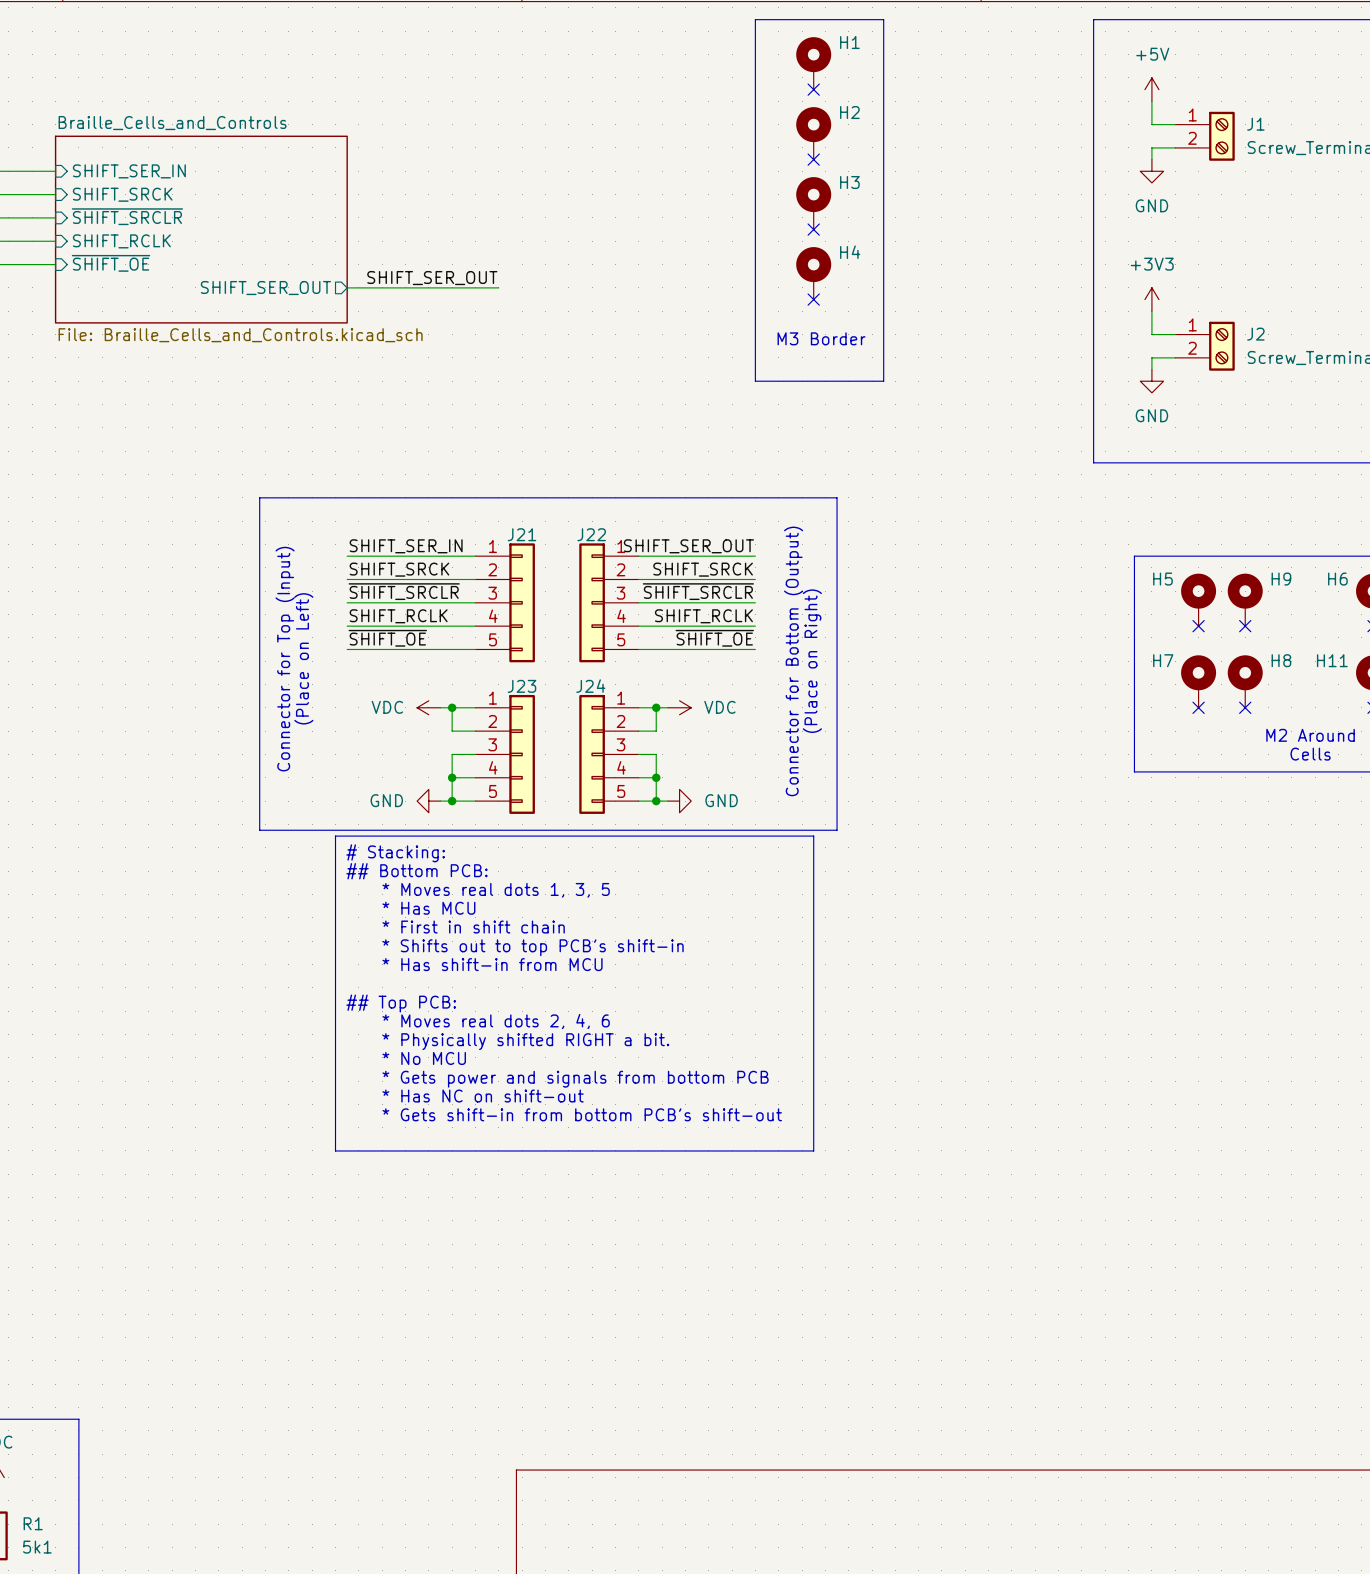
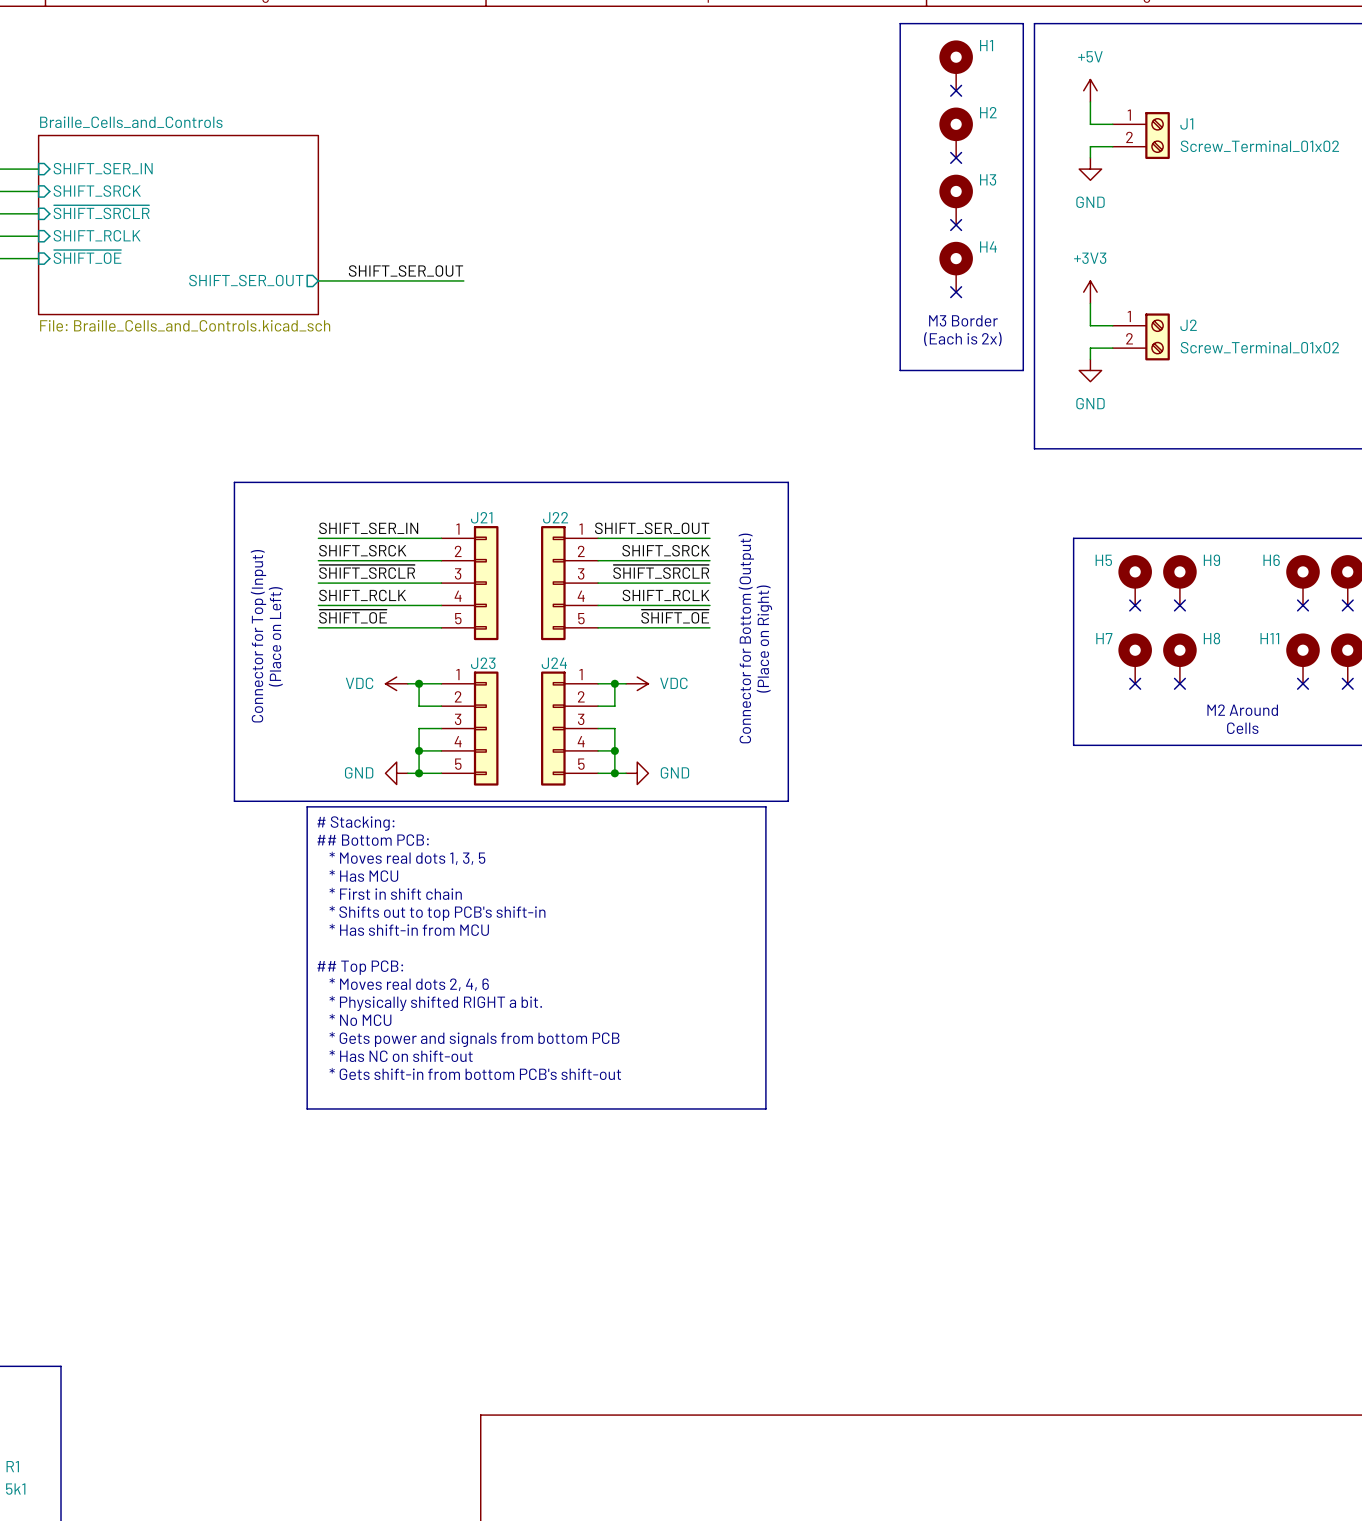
line: (755, 19) (883, 19) (883, 381) (755, 381) (755, 19) -> (900, 23) (1023, 23) (1023, 370) (900, 370) (900, 23)
H1 position: (813, 63) -> (956, 65)
no-connect mark: (813, 89) -> none
no-connect mark: none -> (956, 90)
H2 position: (813, 133) -> (956, 132)
no-connect mark: (813, 159) -> none
no-connect mark: none -> (956, 157)
H3 position: (813, 203) -> (956, 199)
no-connect mark: (813, 229) -> none
no-connect mark: none -> (956, 225)
H4 position: (813, 273) -> (956, 266)
no-connect mark: (813, 299) -> none
no-connect mark: none -> (956, 292)
text position: M3 Border (821, 338) -> M3 Border (963, 320)
text: none -> (Each is 2x) (962, 339)

